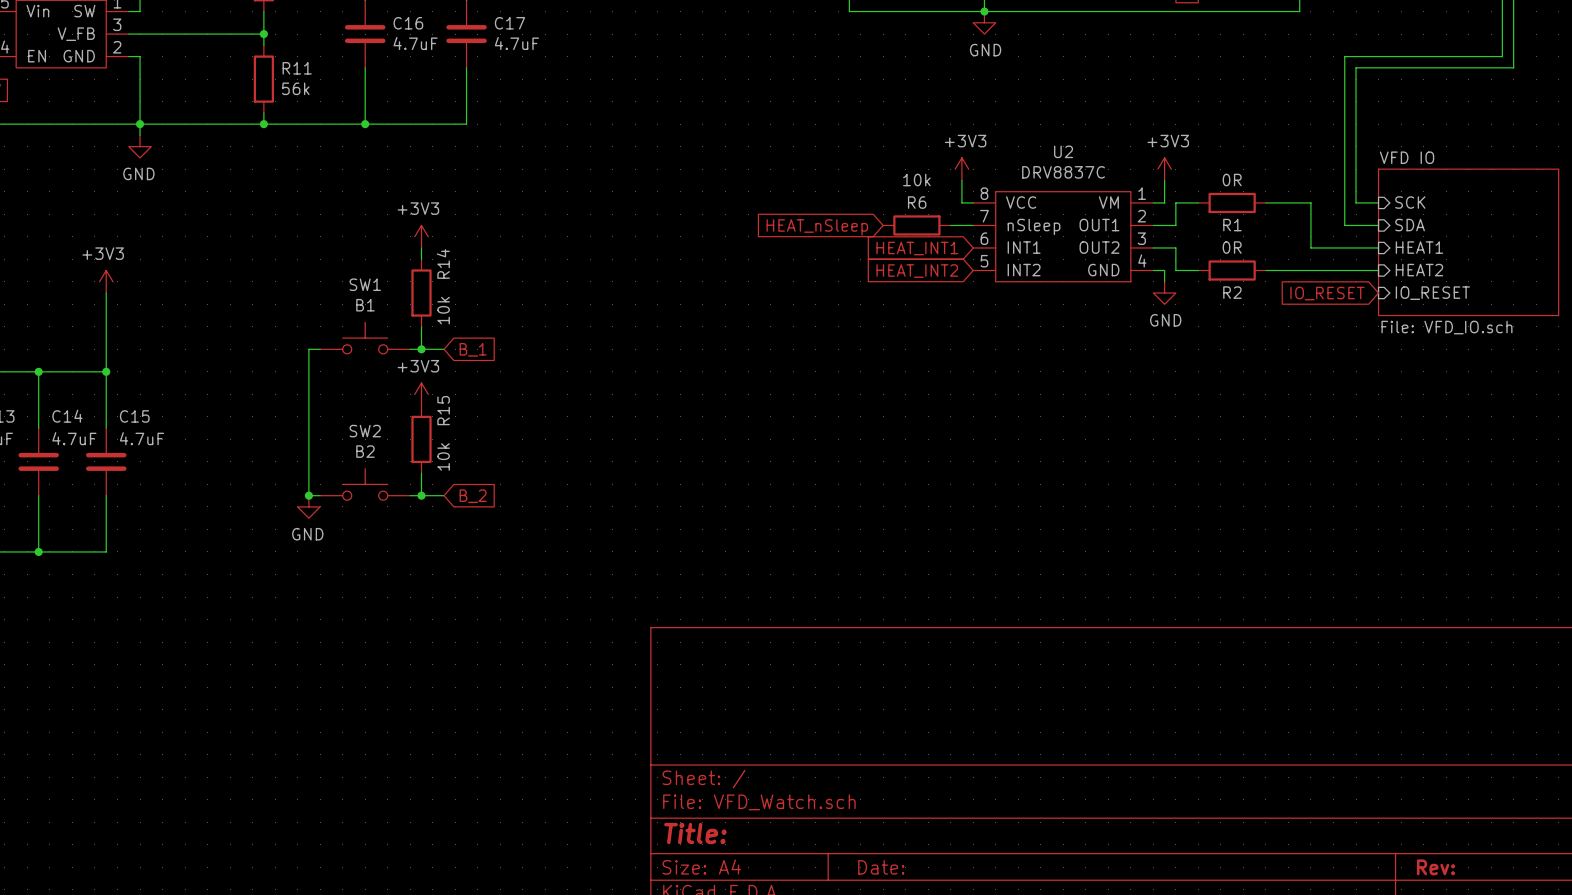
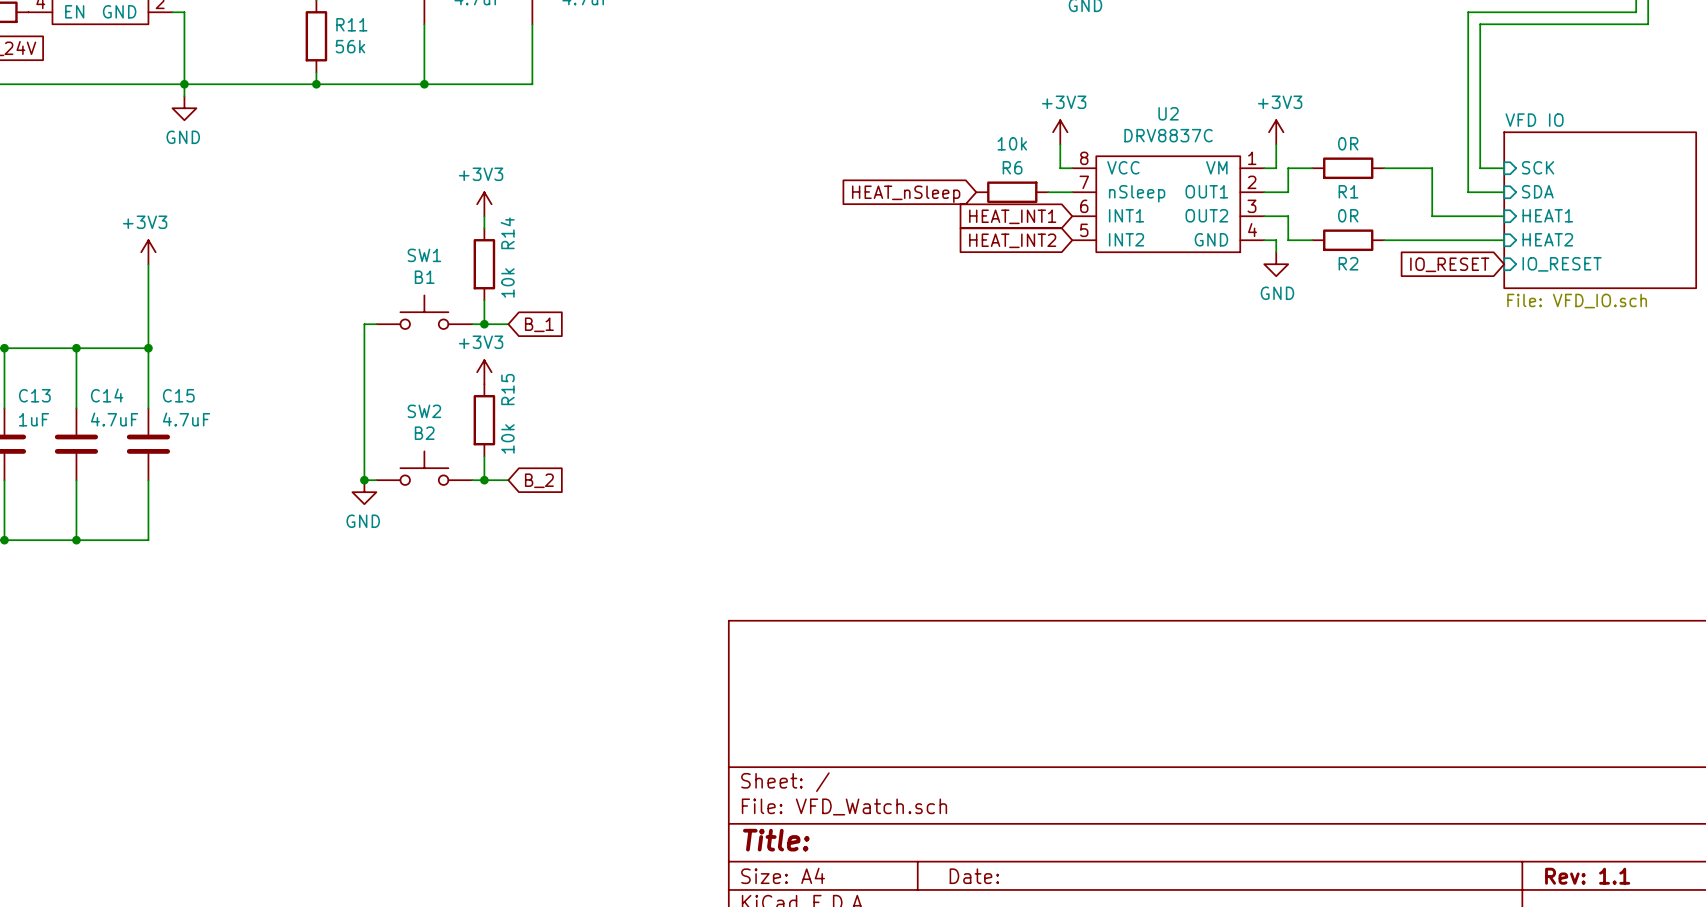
title block: Rev: (1435, 867) -> Rev: 1.1 (1587, 876)

